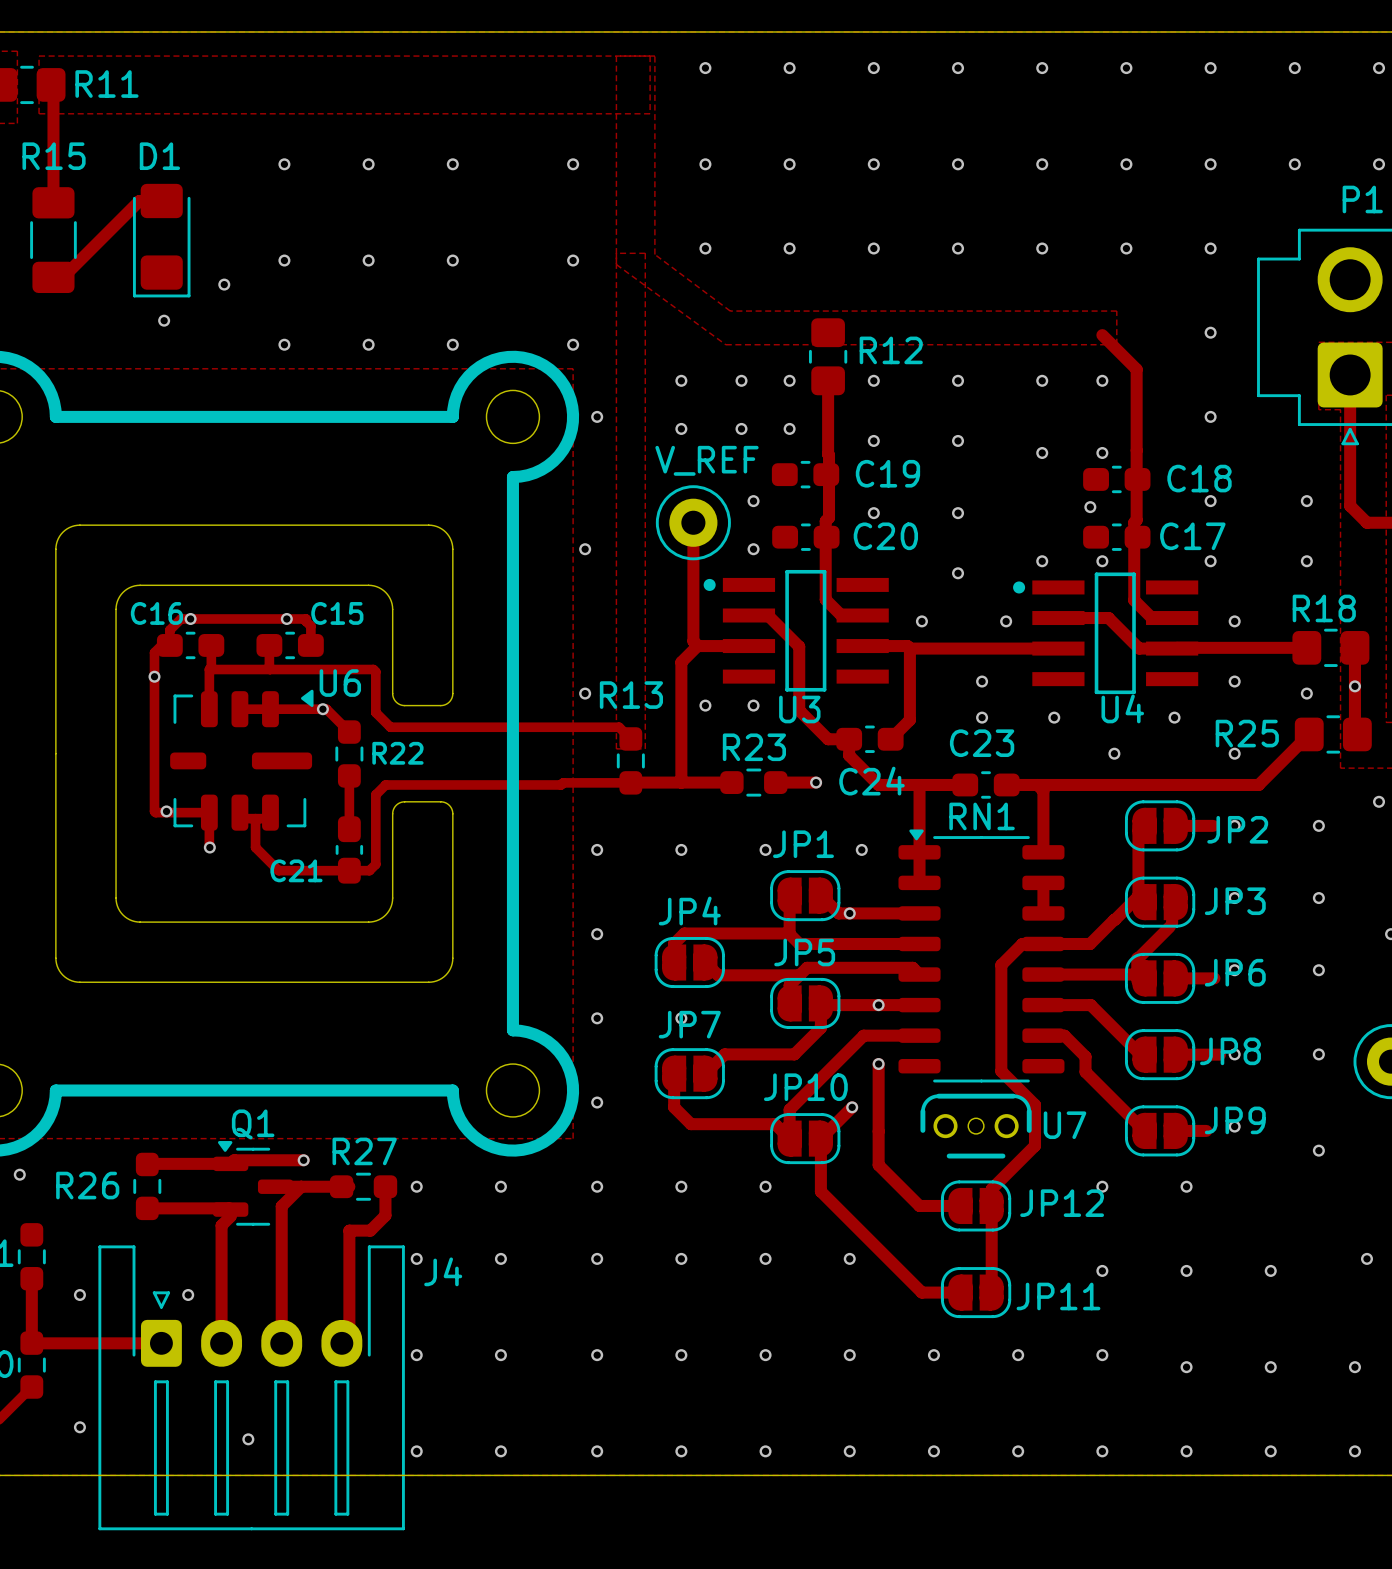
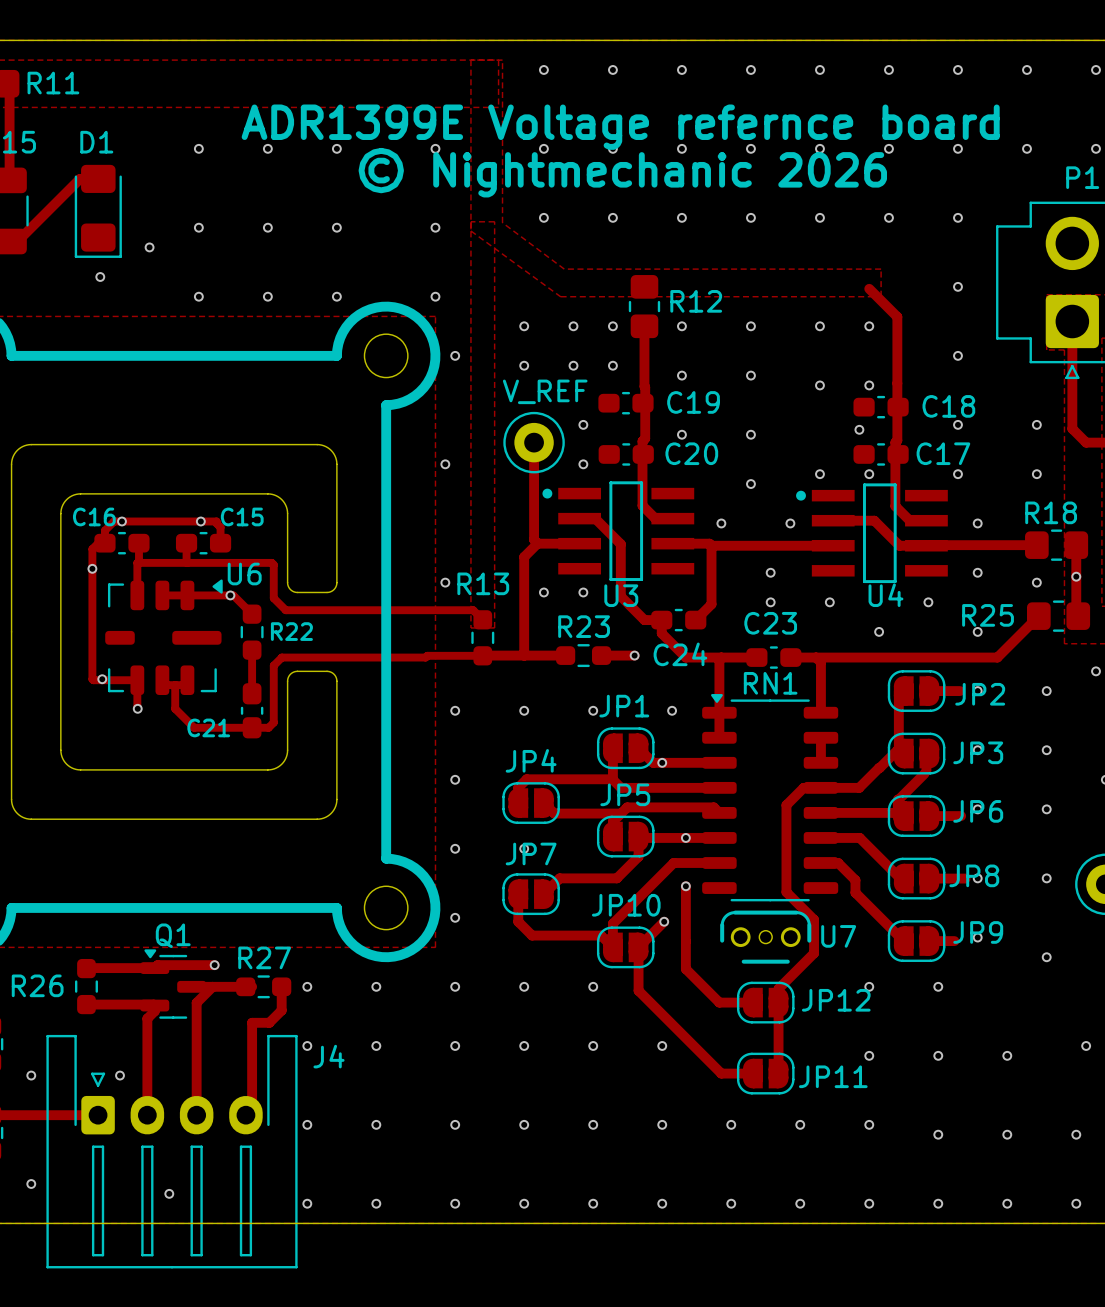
text: none -> ADR1399E Voltage refernce board (620, 127)
text: none -> © Nightmechanic 2026 (622, 172)

